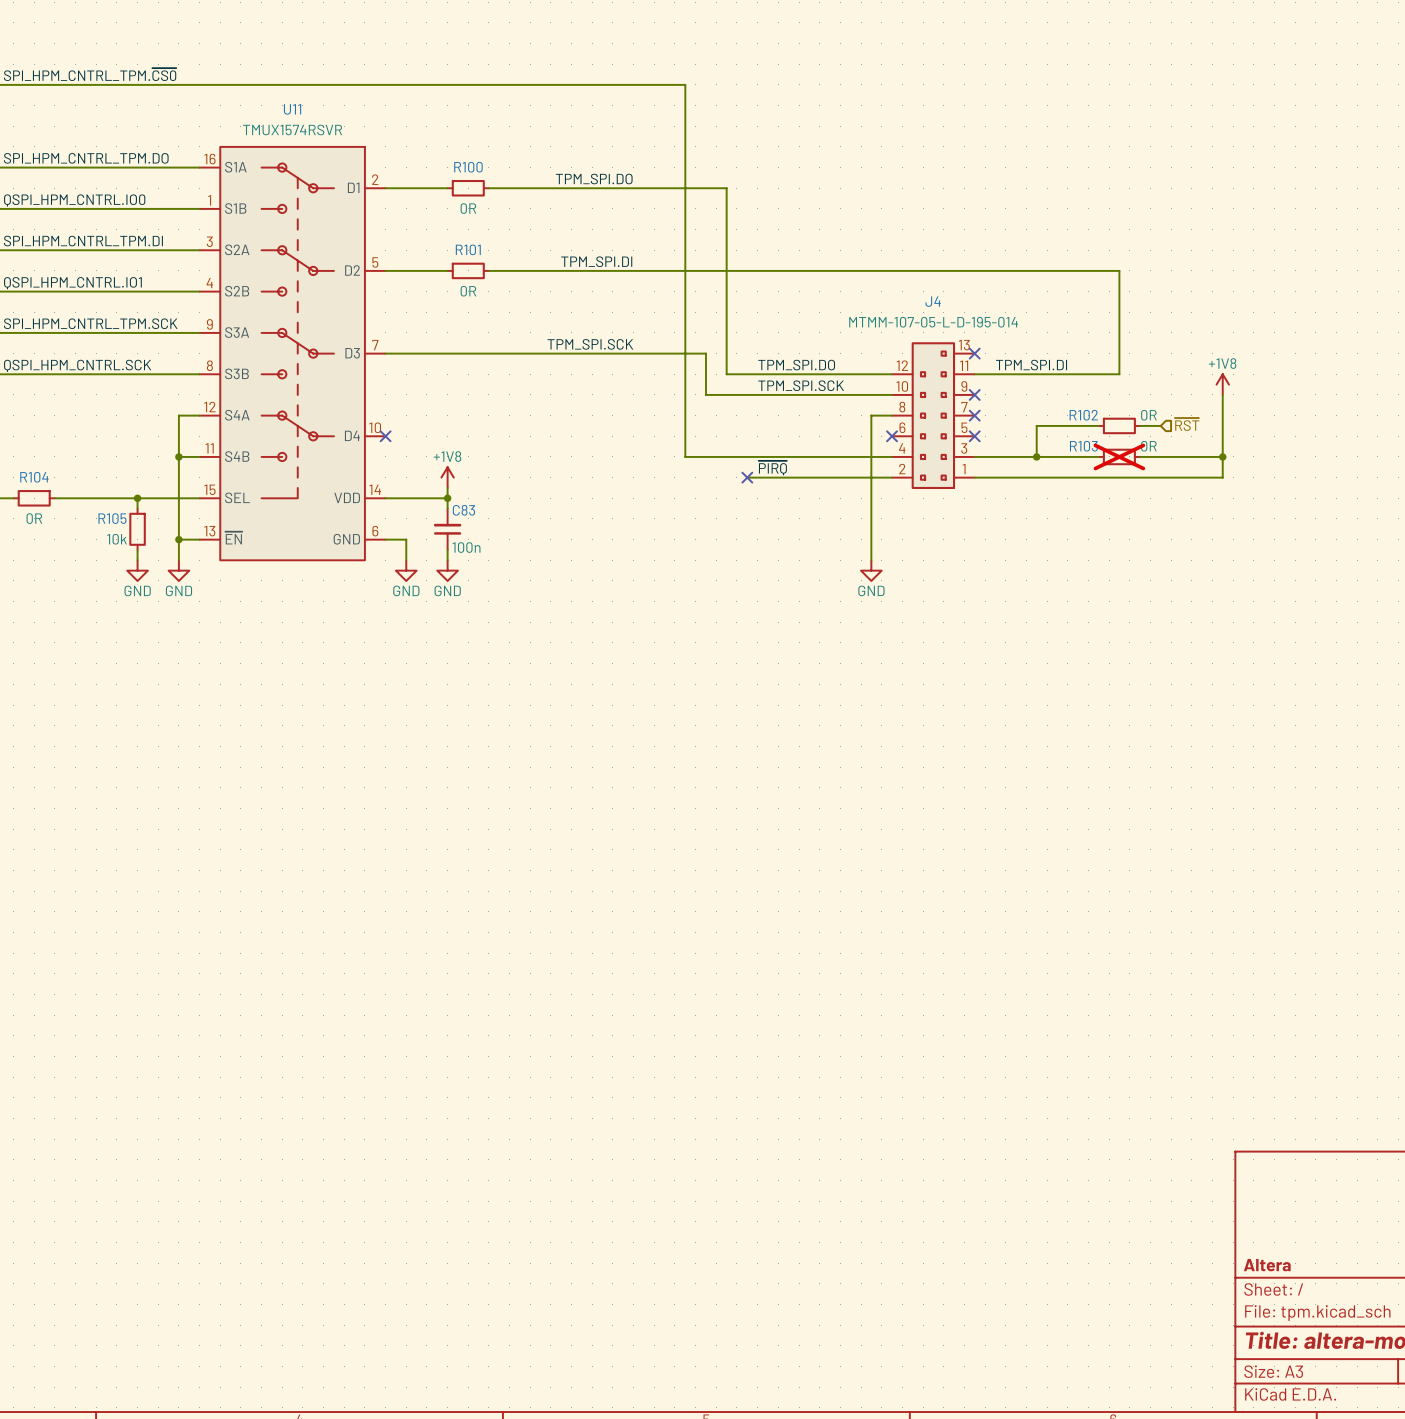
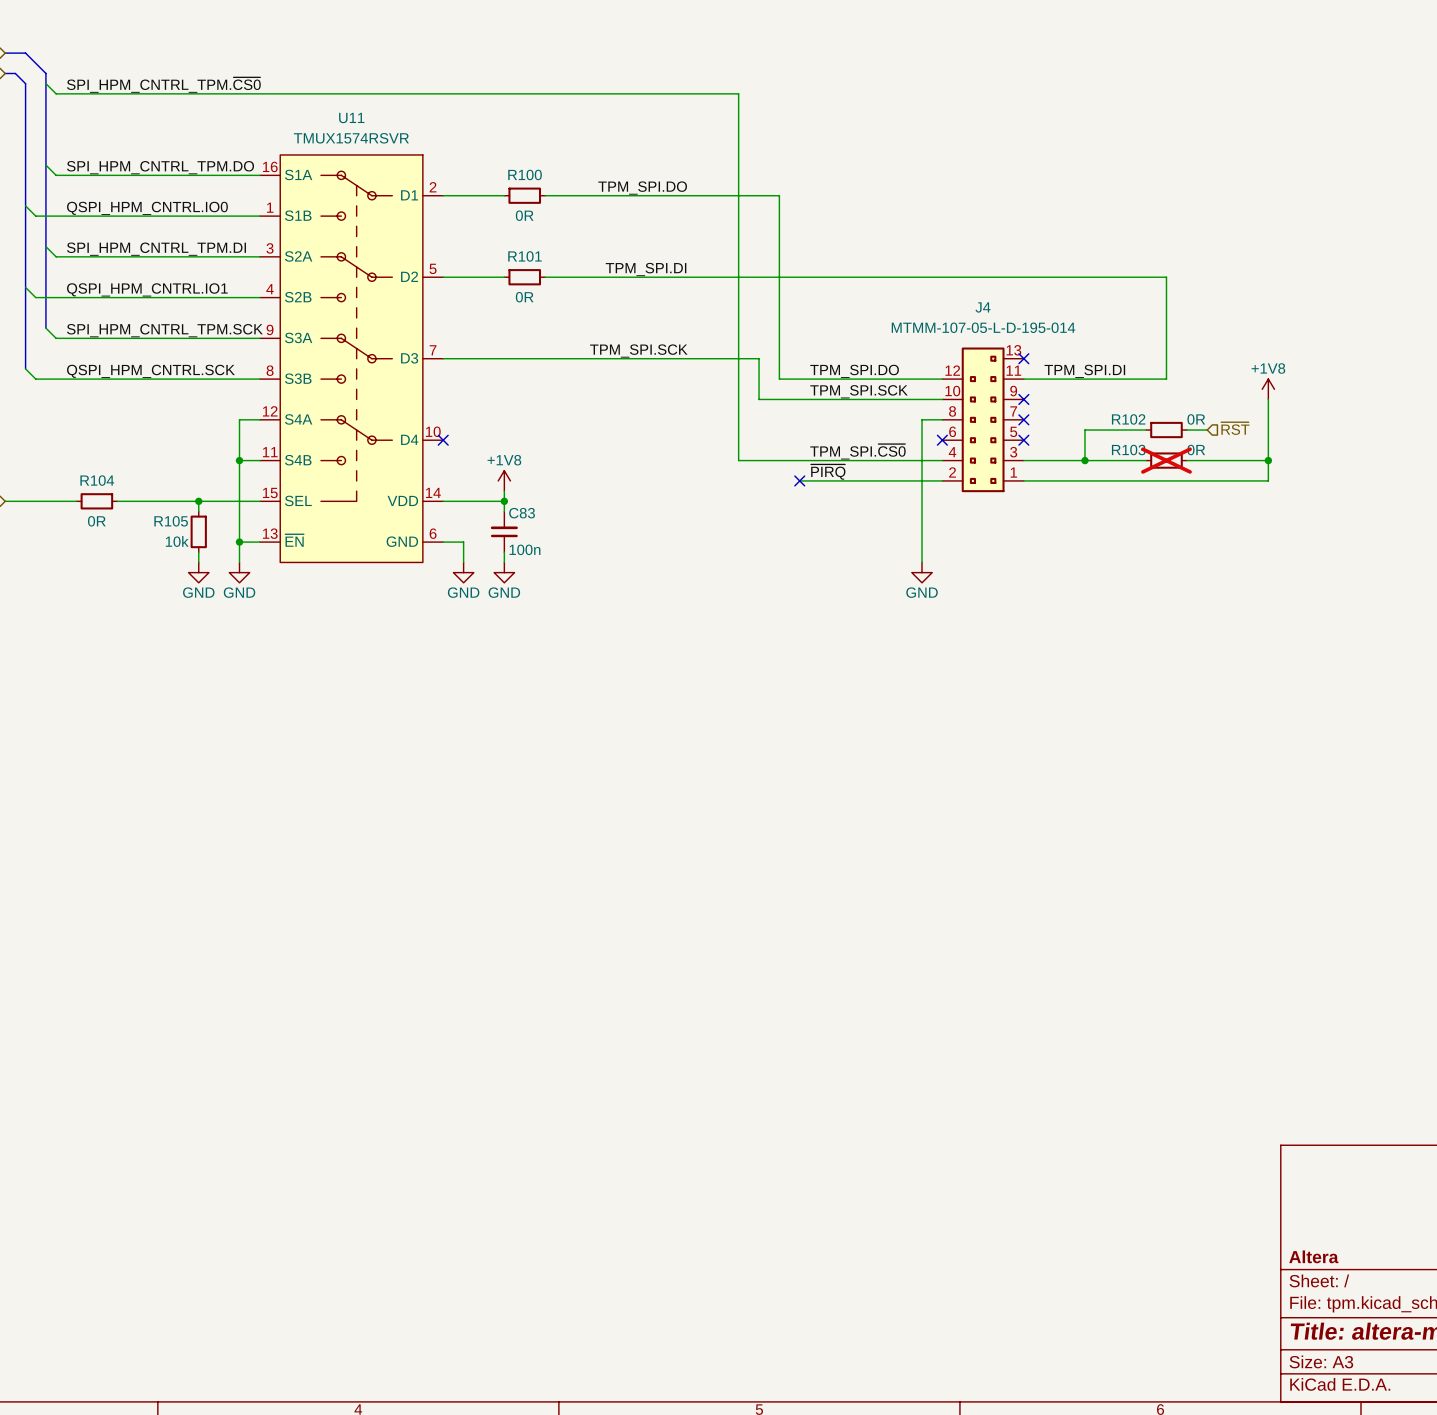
label: none -> TPM_SPI.~{CS0} (857, 451)

